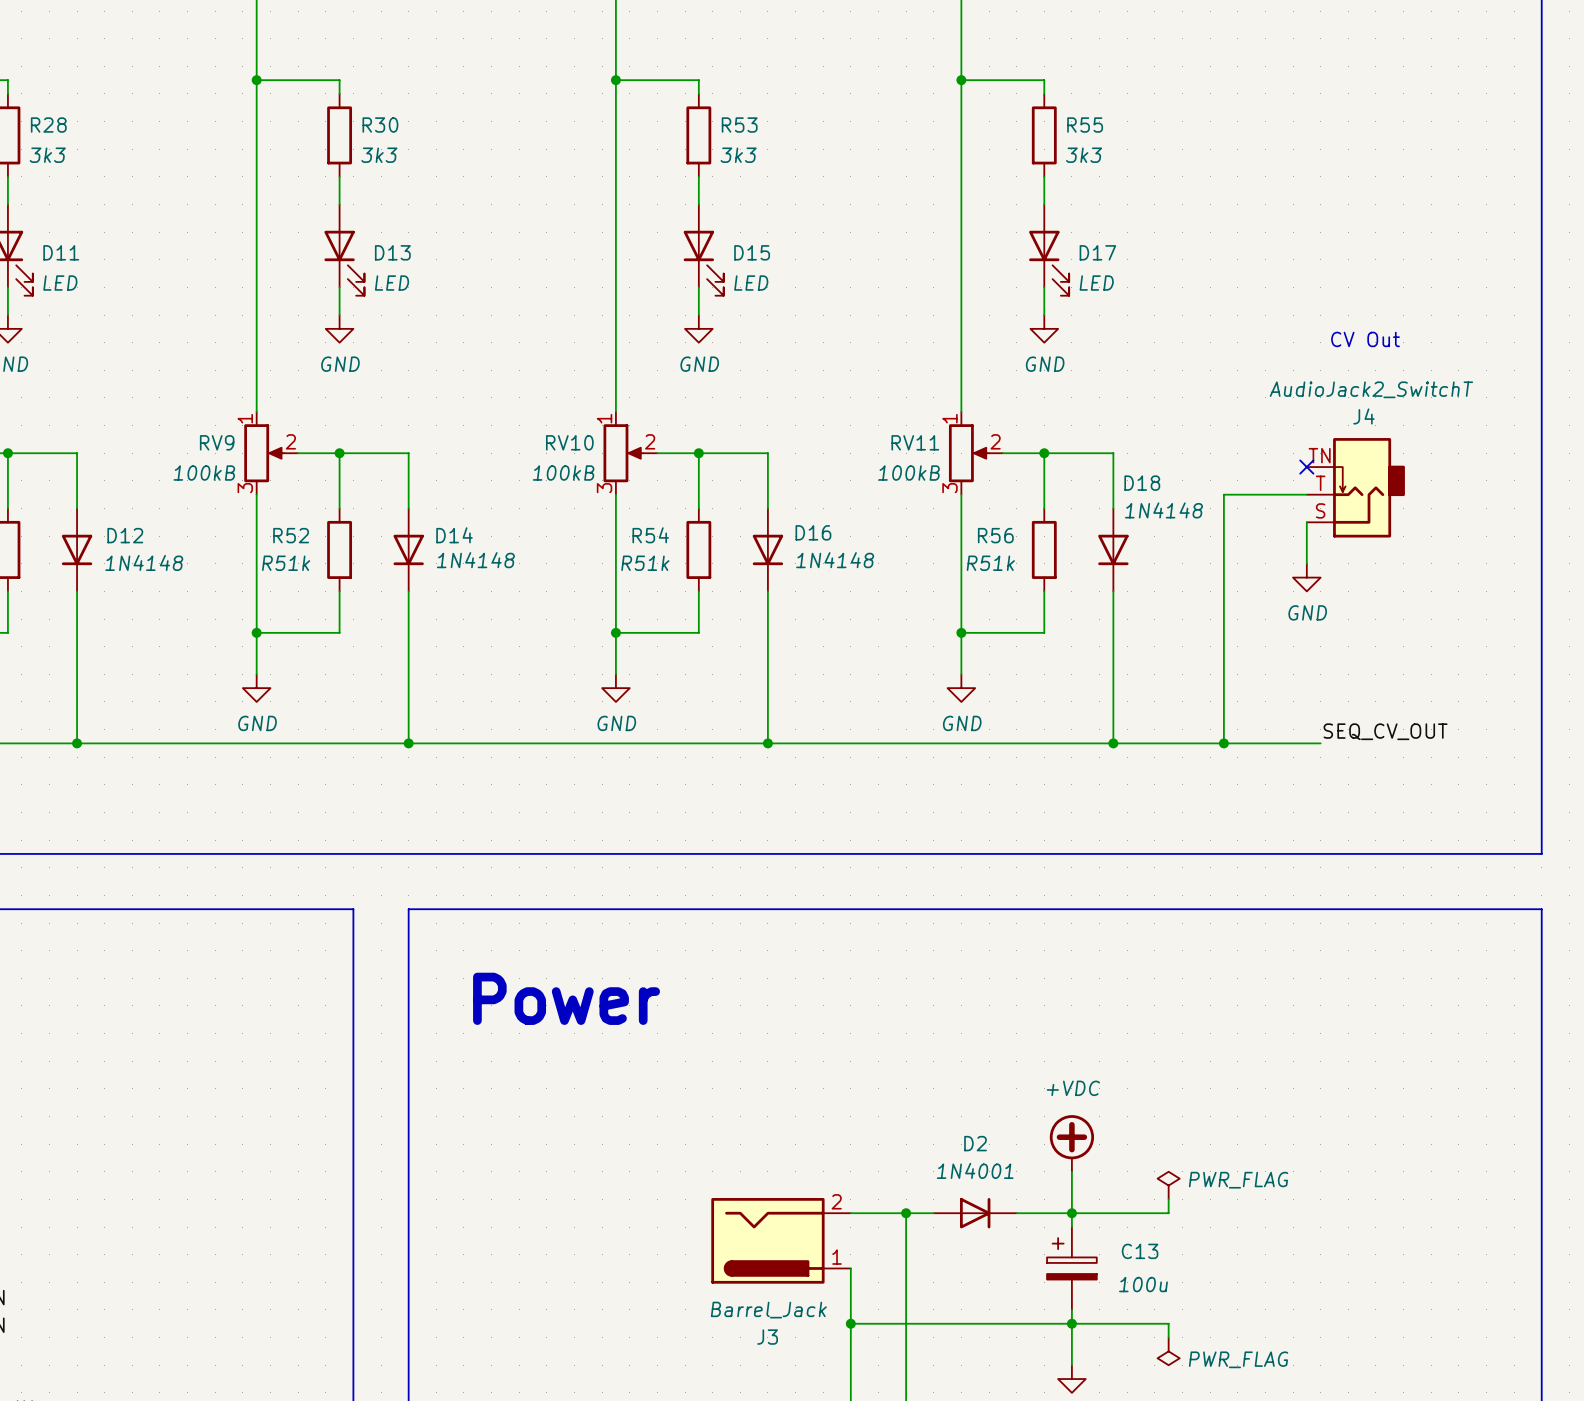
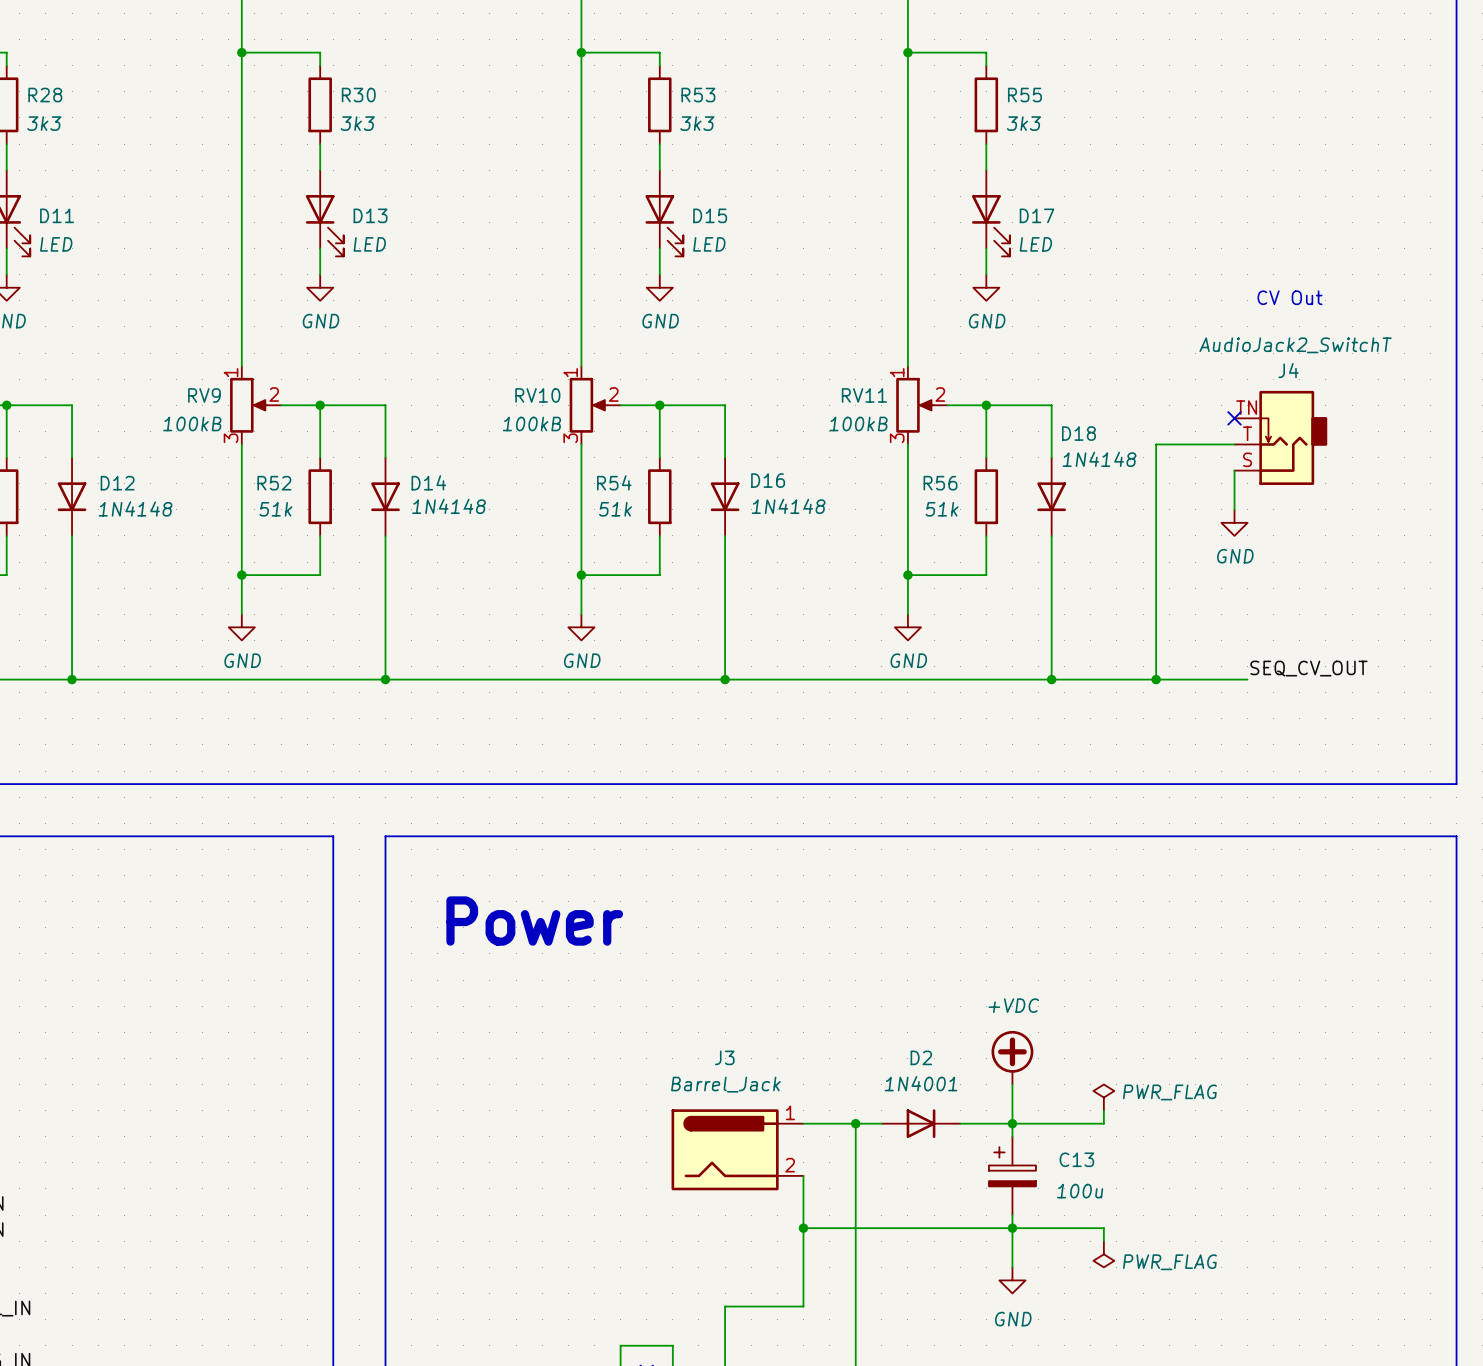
R52 value: R51k (286, 563) -> 51k (275, 509)
R54 value: R51k (645, 563) -> 51k (615, 509)
R56 value: R51k (990, 563) -> 51k (942, 509)
J3 flip: as is (767, 1240) -> up-down (725, 1149)

